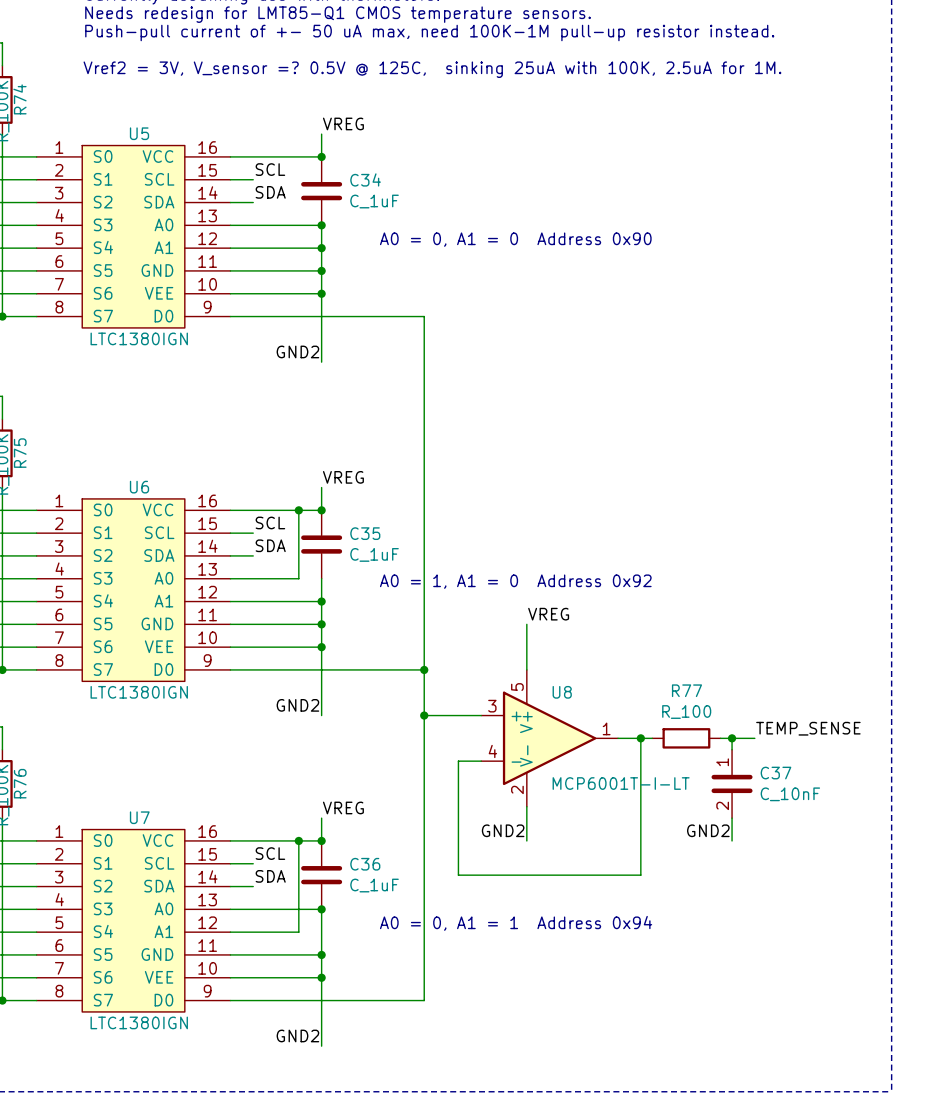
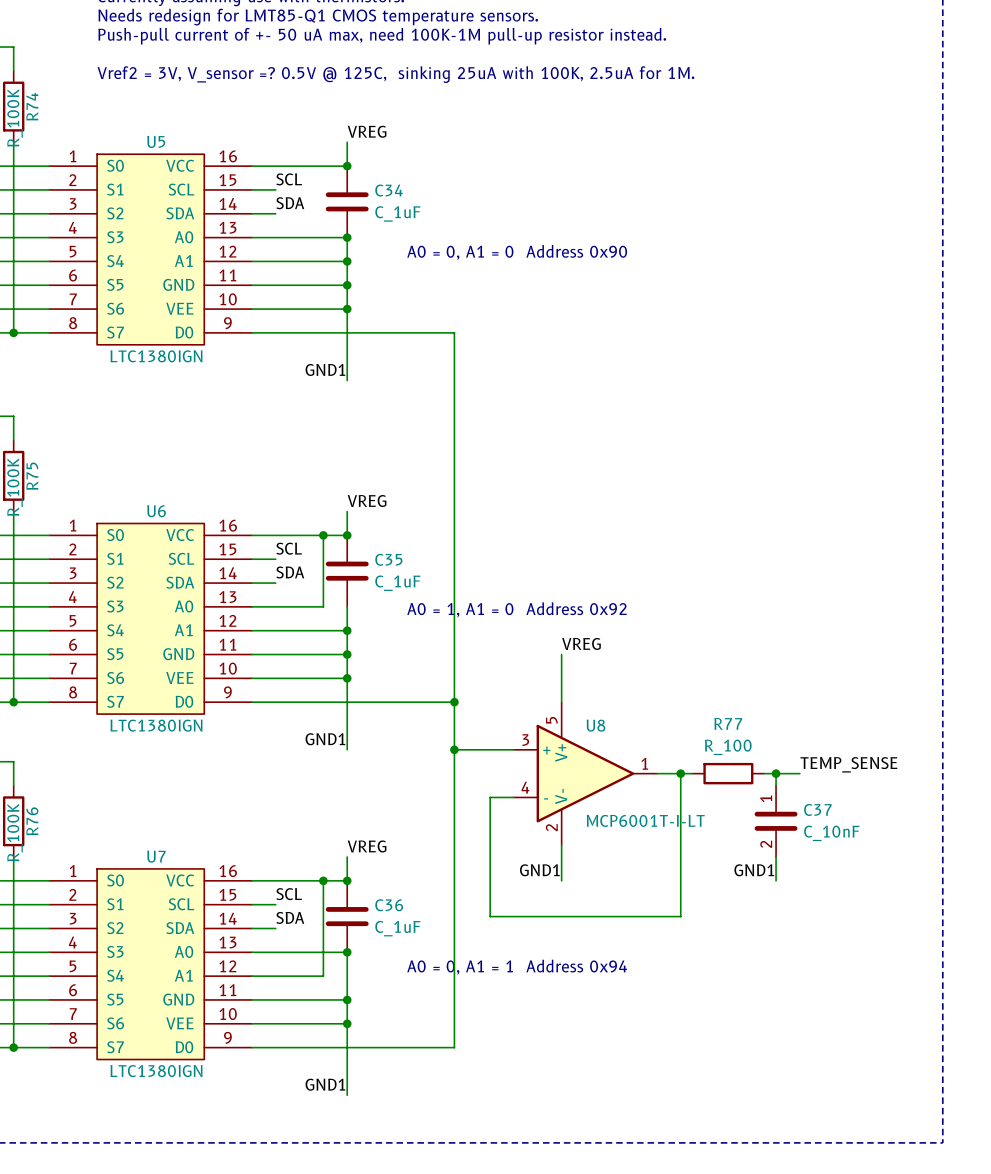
label: GND2 (297, 351) -> GND1 (325, 369)
label: GND2 (297, 705) -> GND1 (325, 739)
label: GND2 (503, 830) -> GND1 (539, 870)
label: GND2 (708, 830) -> GND1 (754, 870)
label: GND2 (297, 1035) -> GND1 (325, 1084)

